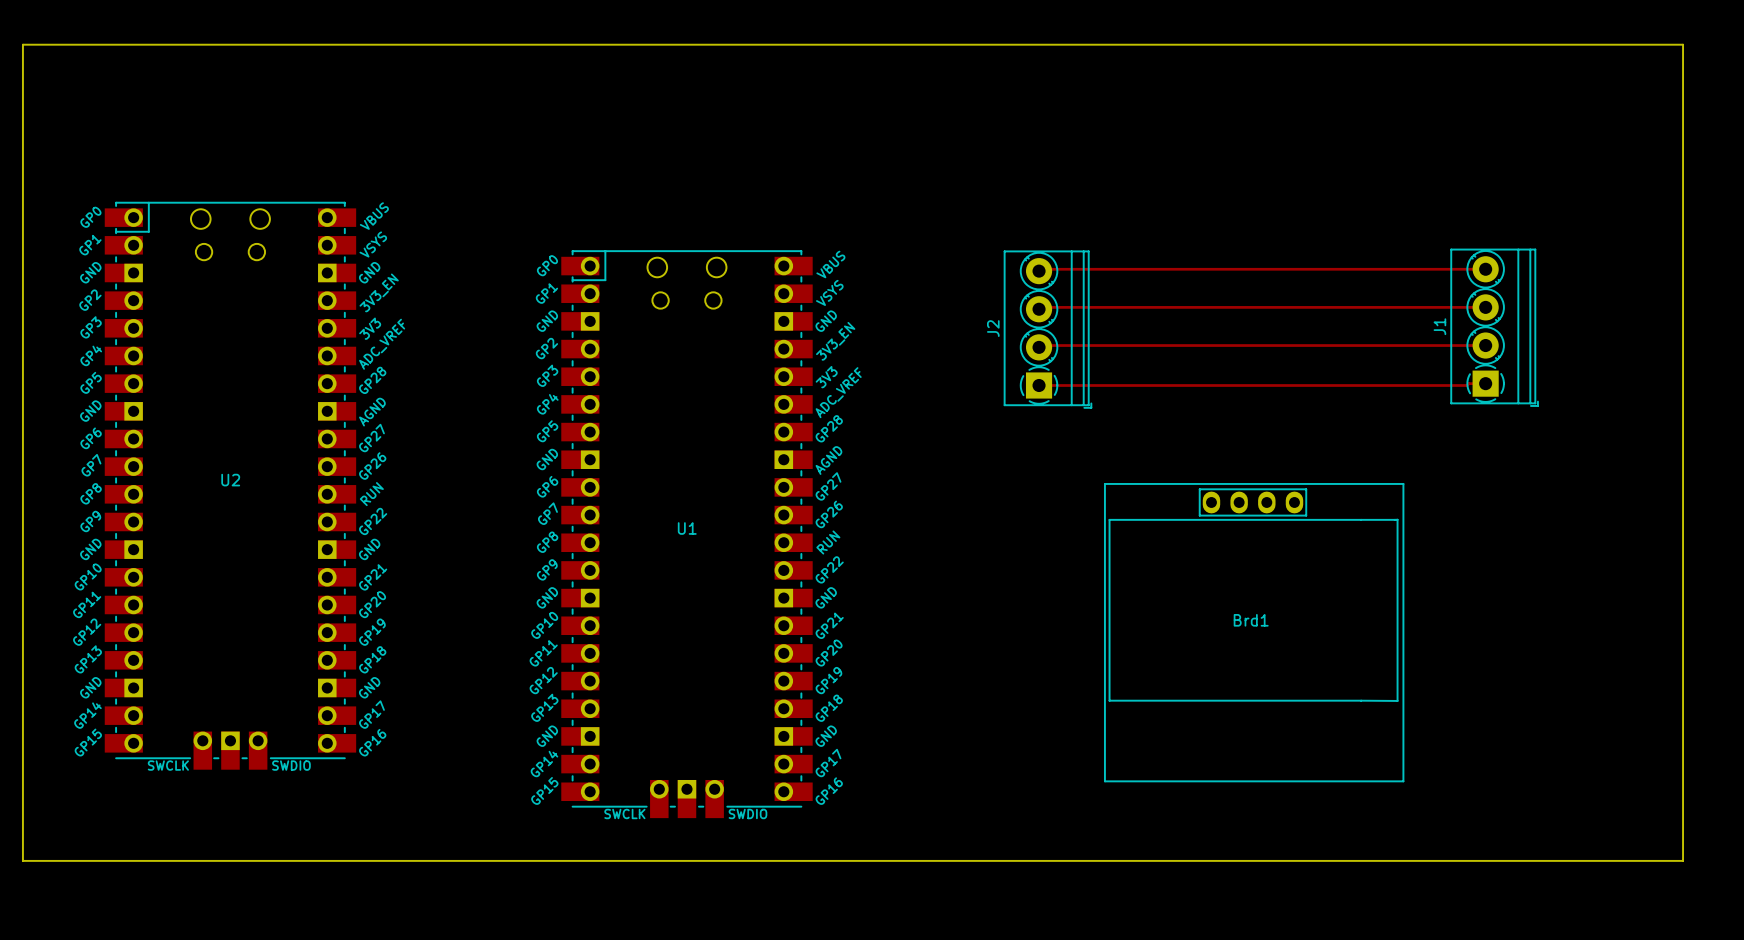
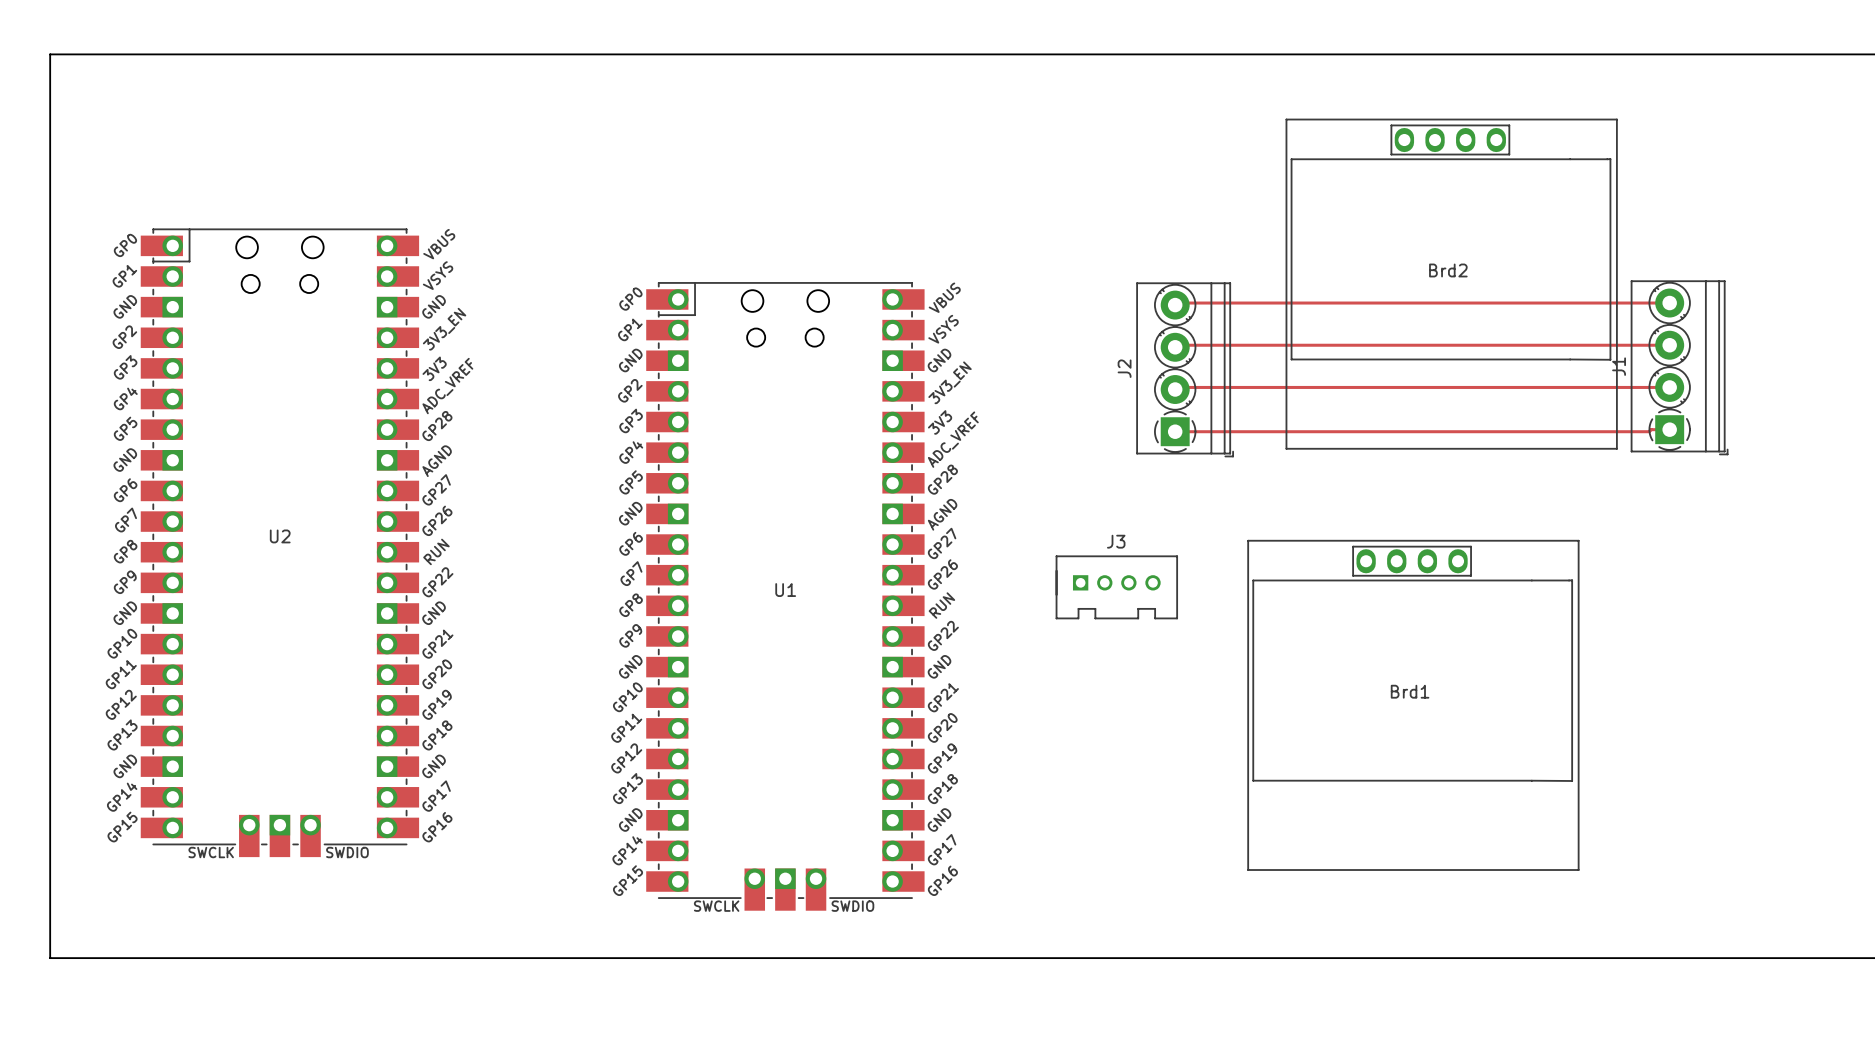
Brd2: none -> (1451, 284)
J3: none -> (1116, 587)

